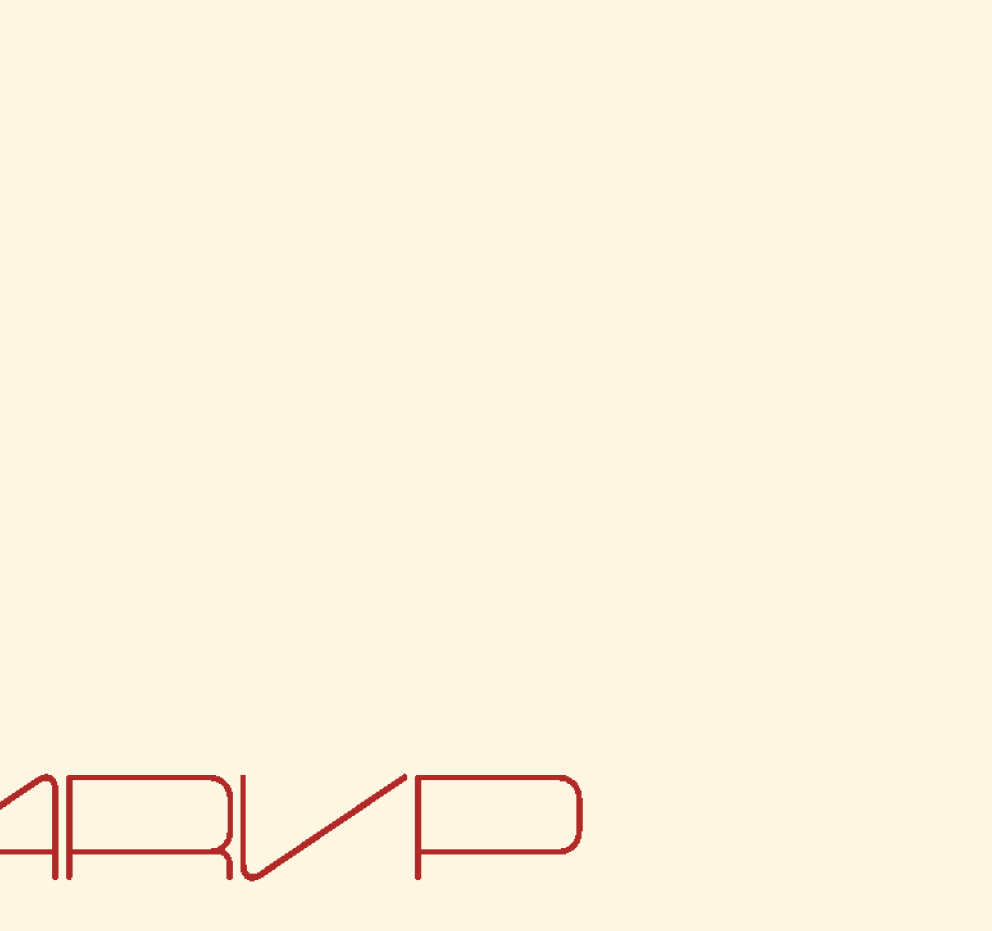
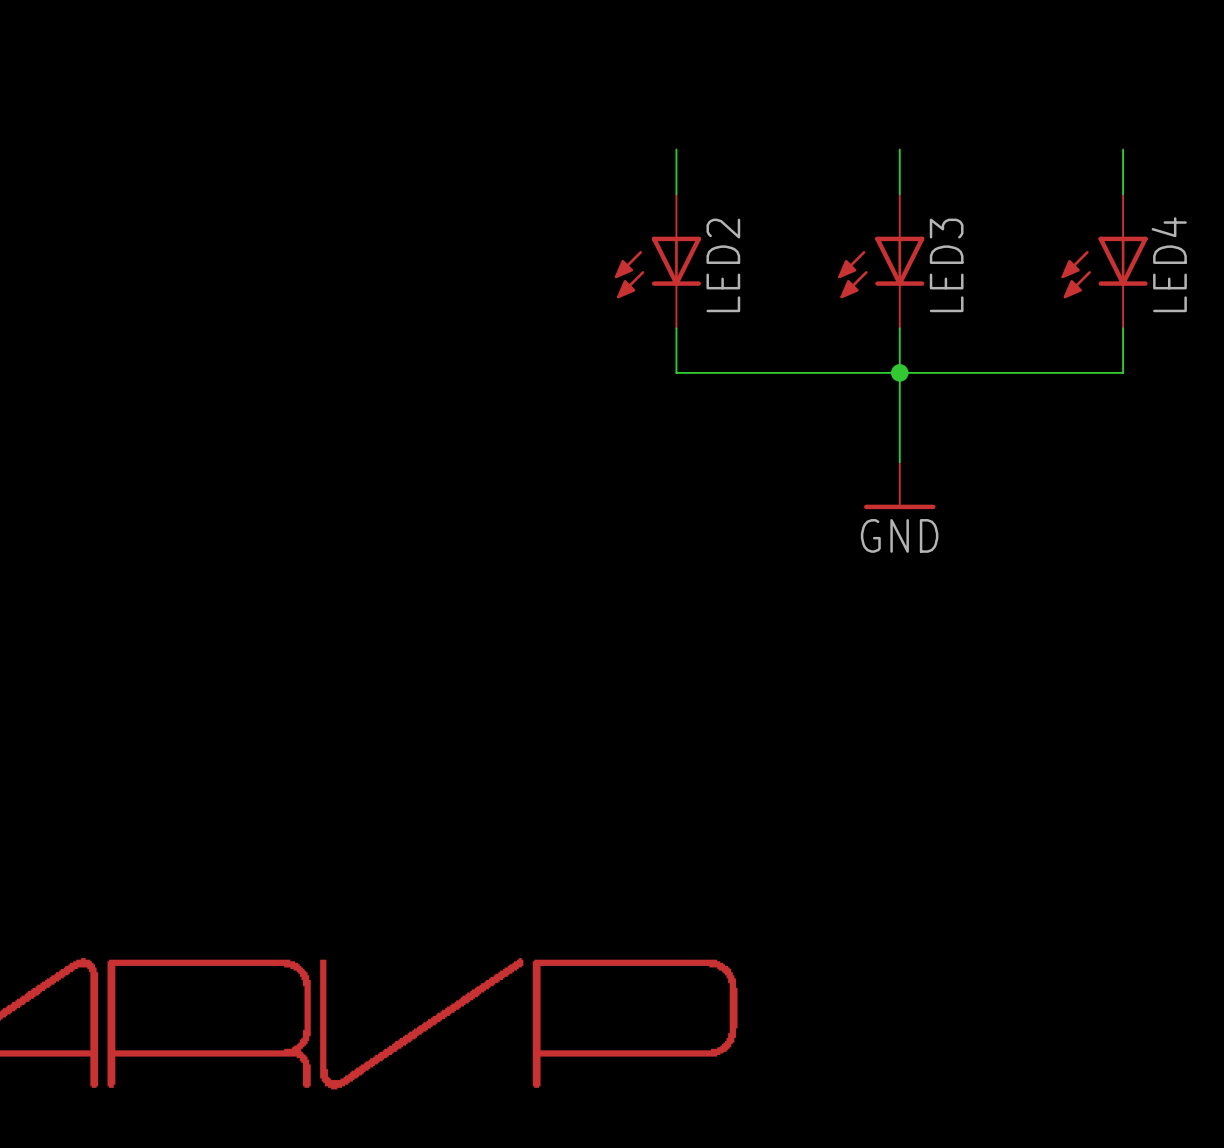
wire: none -> (676, 149) (676, 194)
wire: none -> (899, 149) (899, 194)
wire: none -> (1123, 149) (1123, 194)
LED2: none -> (657, 261)
LED3: none -> (881, 261)
LED4: none -> (1104, 261)
wire: none -> (676, 328) (676, 372) (1123, 372) (1123, 328)
wire: none -> (899, 328) (899, 462)
junction: none -> (899, 372)
power symbol: none -> GND (899, 485)

